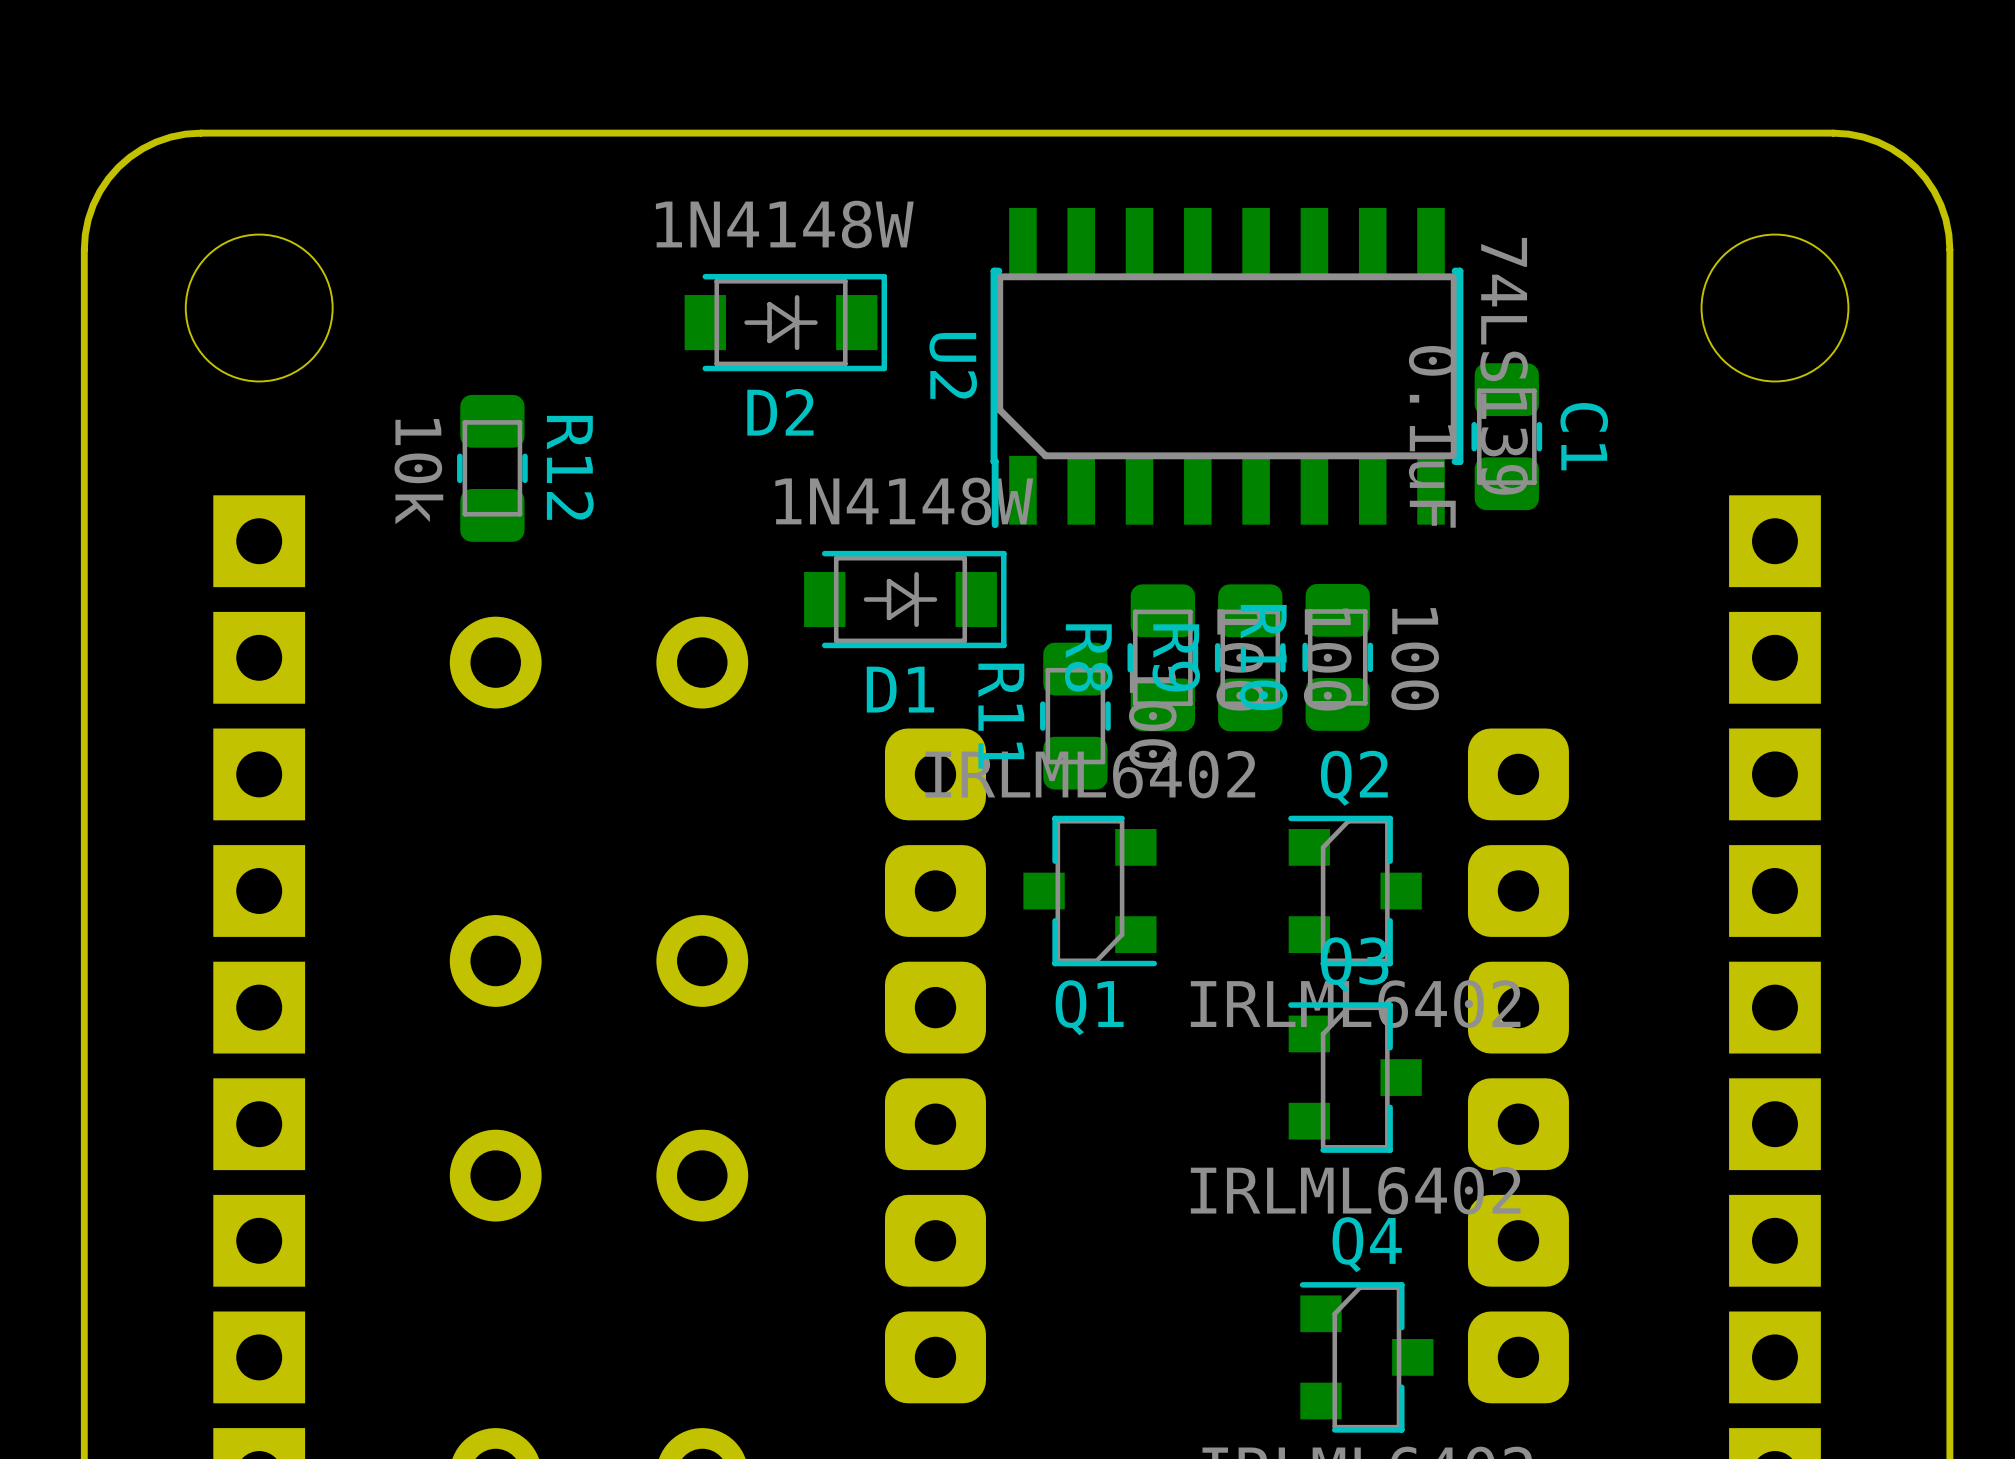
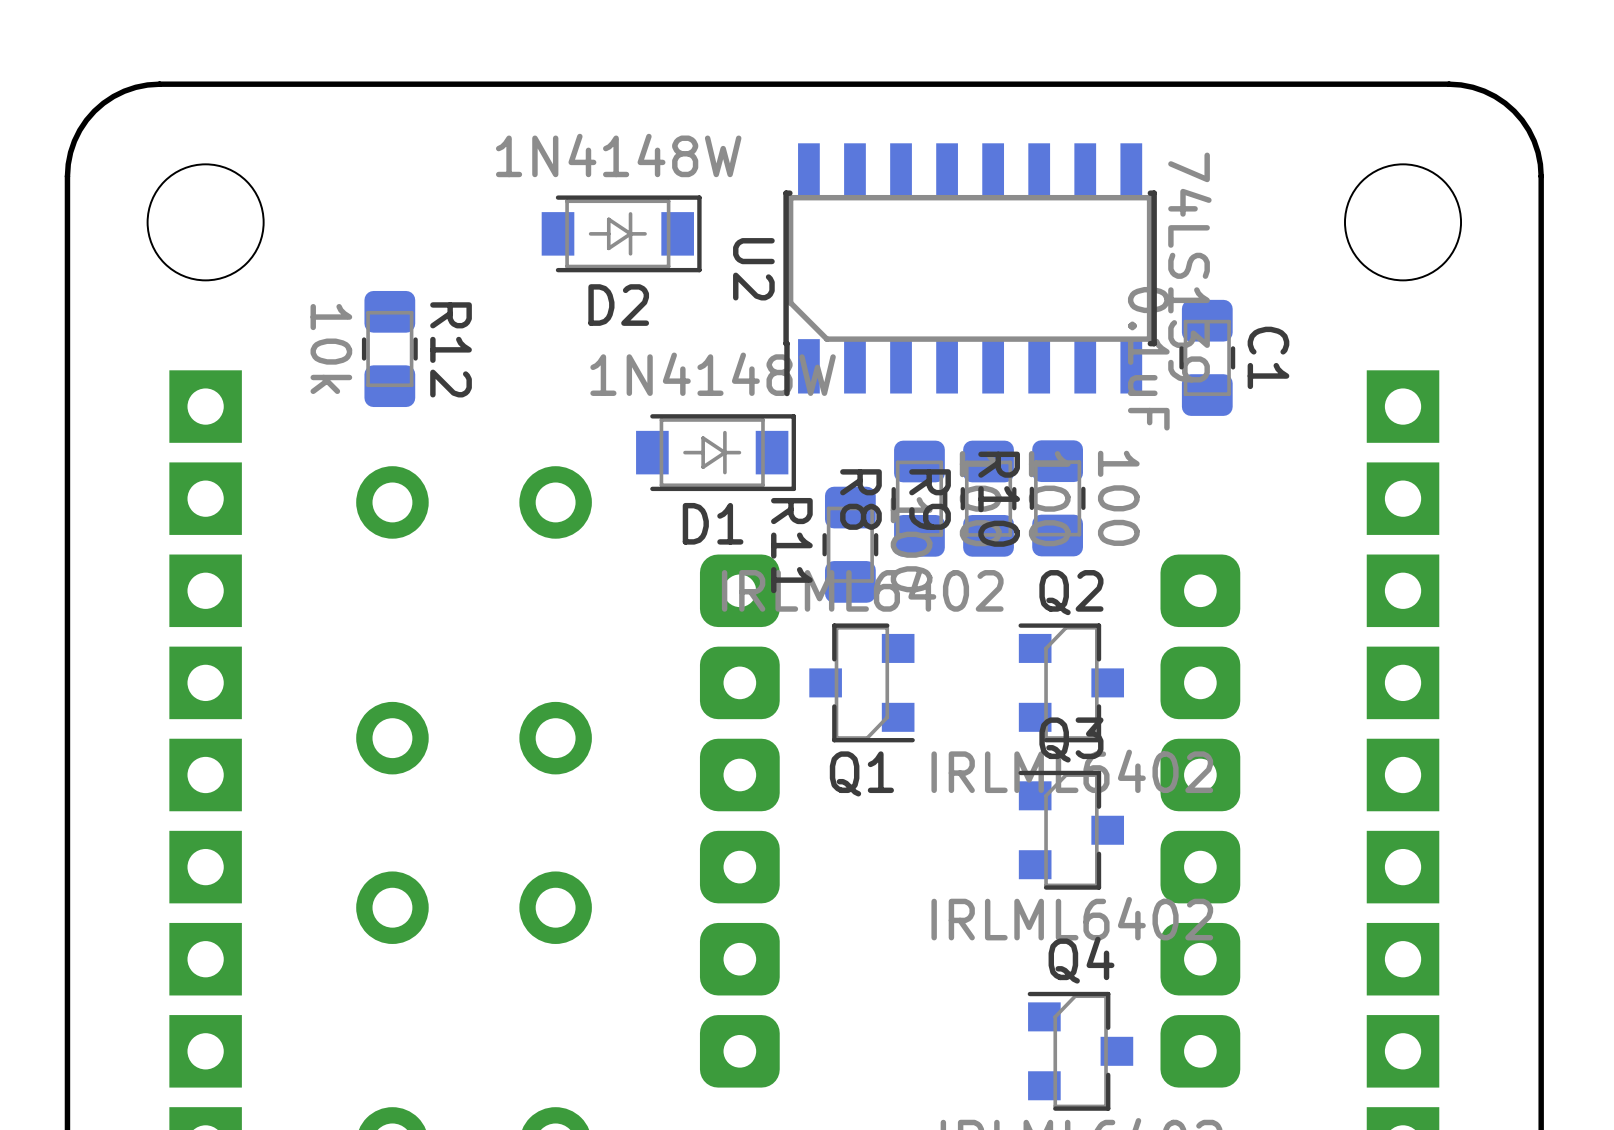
C1 position: (1506, 436) -> (1207, 357)

